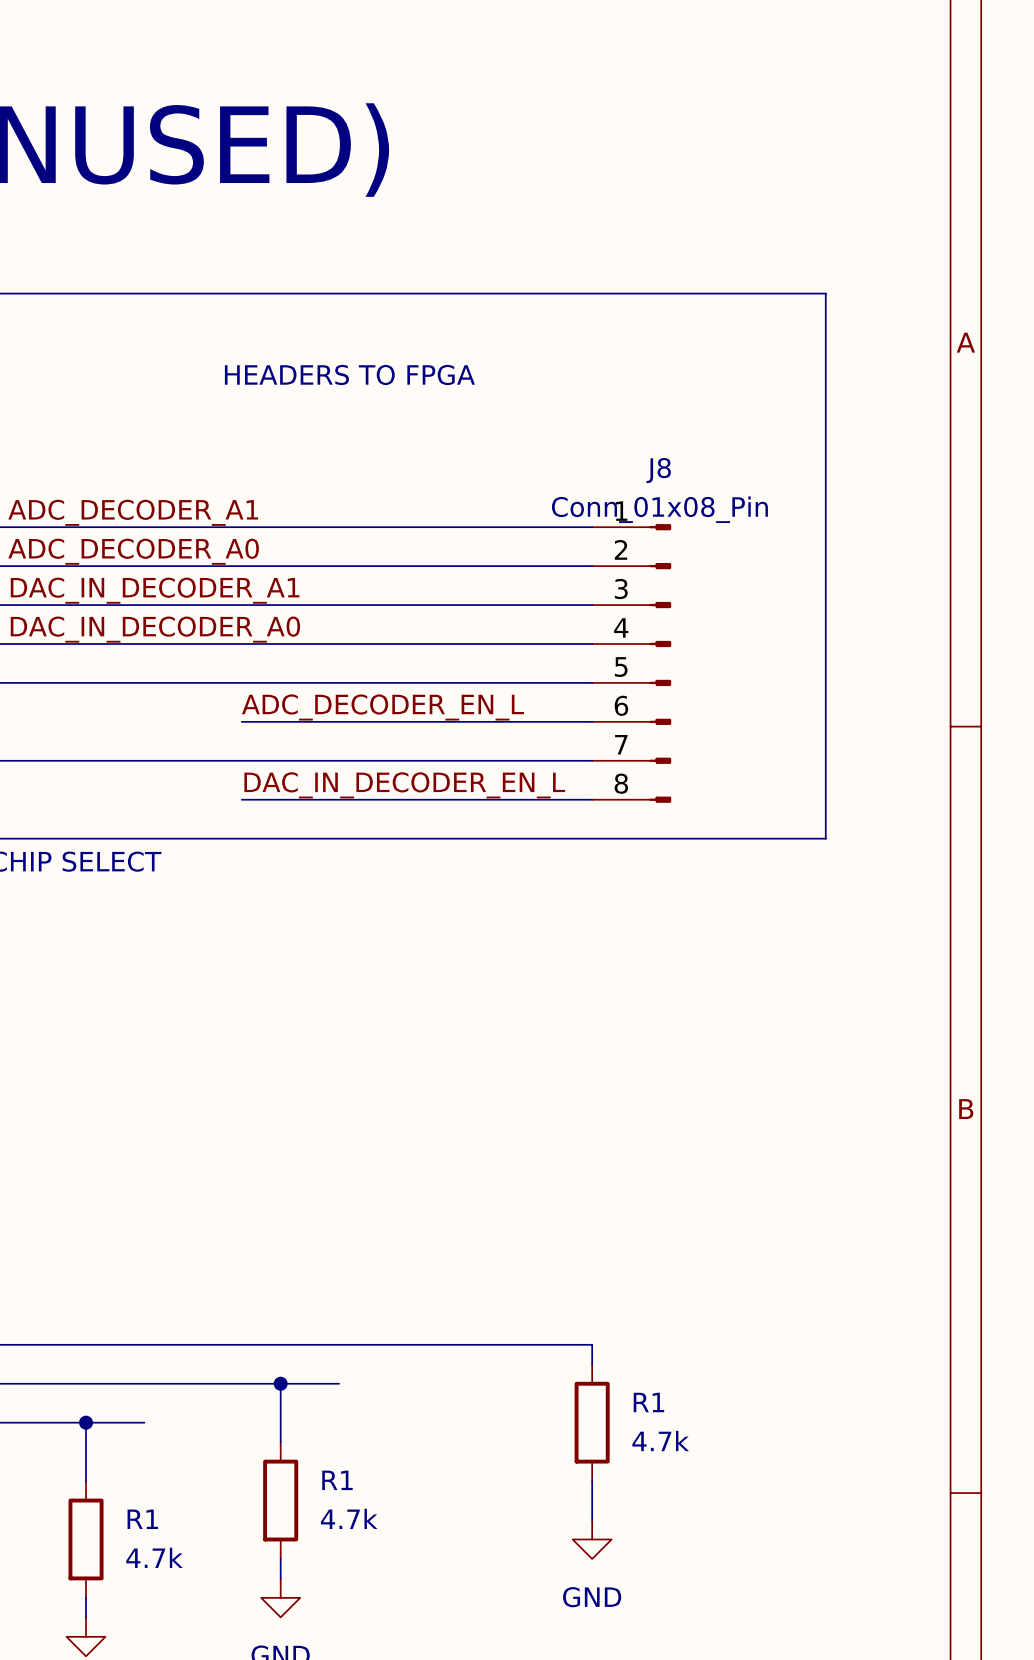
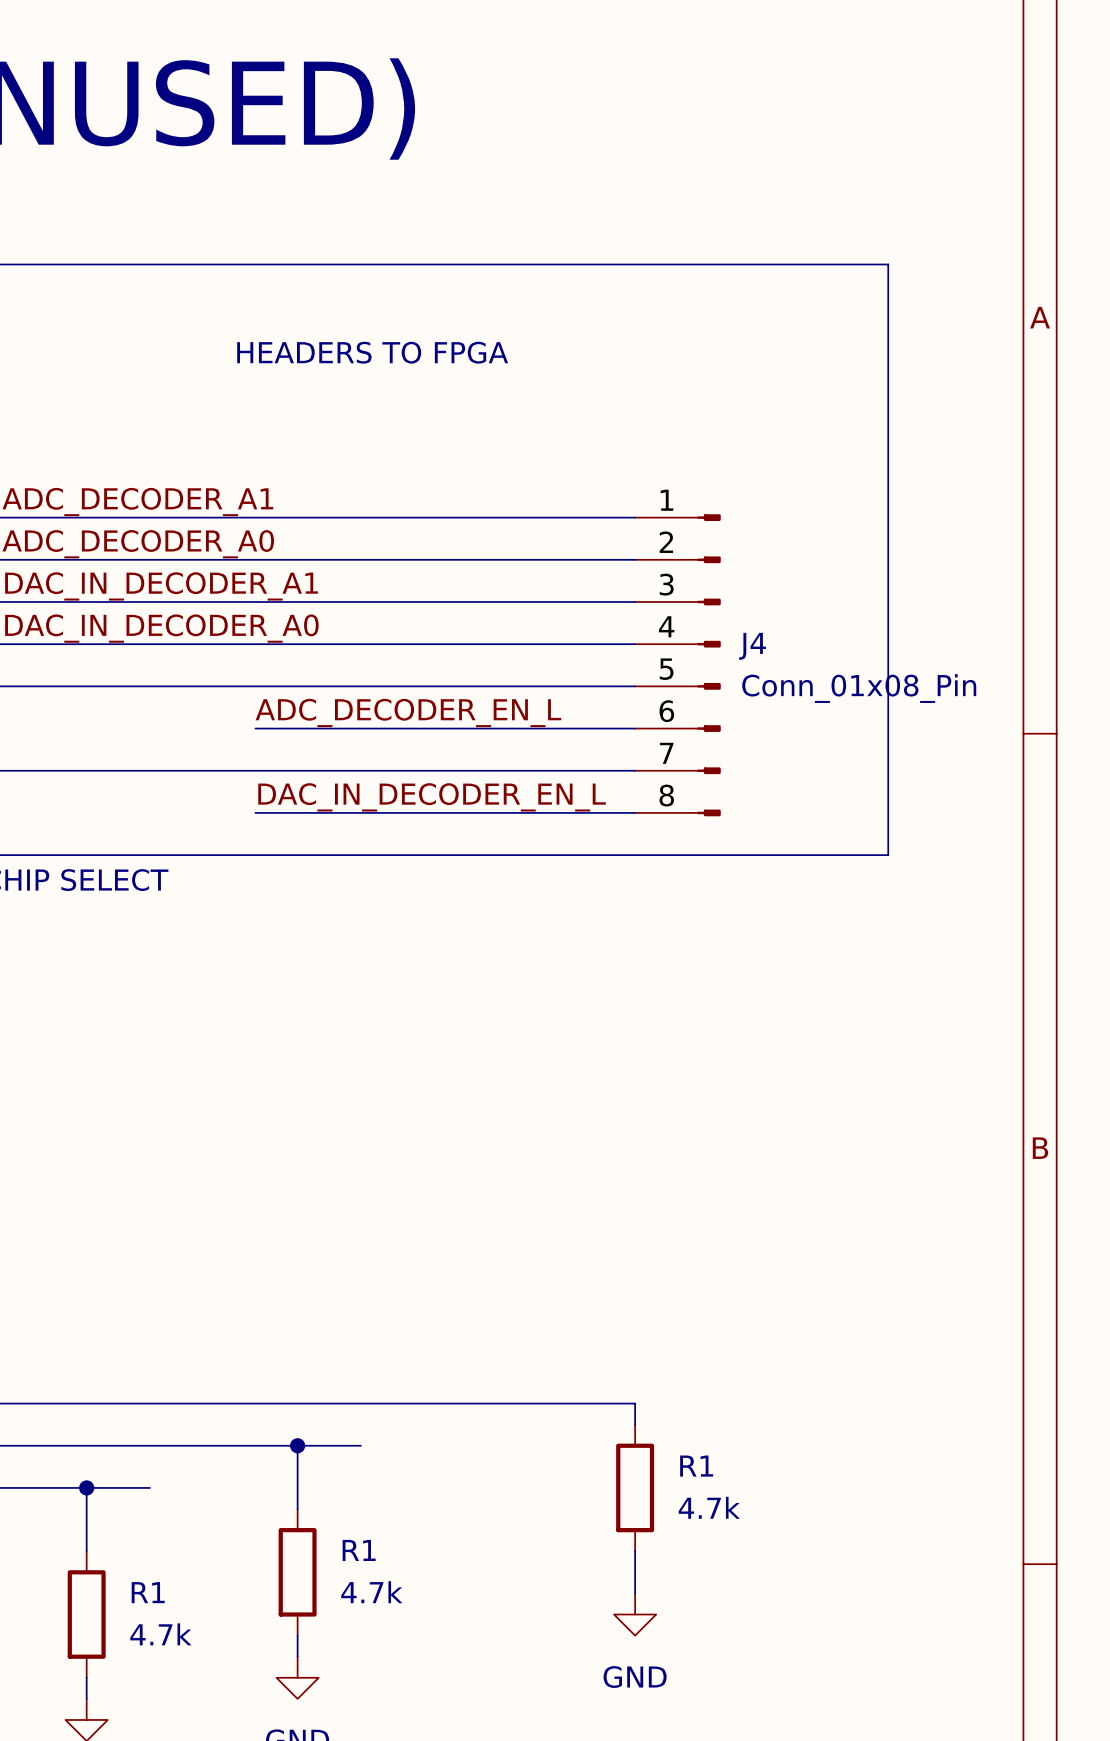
J8 name: J8 (658, 470) -> J4 (752, 646)
J8 value position: Conn_01x08_Pin (659, 509) -> Conn_01x08_Pin (859, 688)

